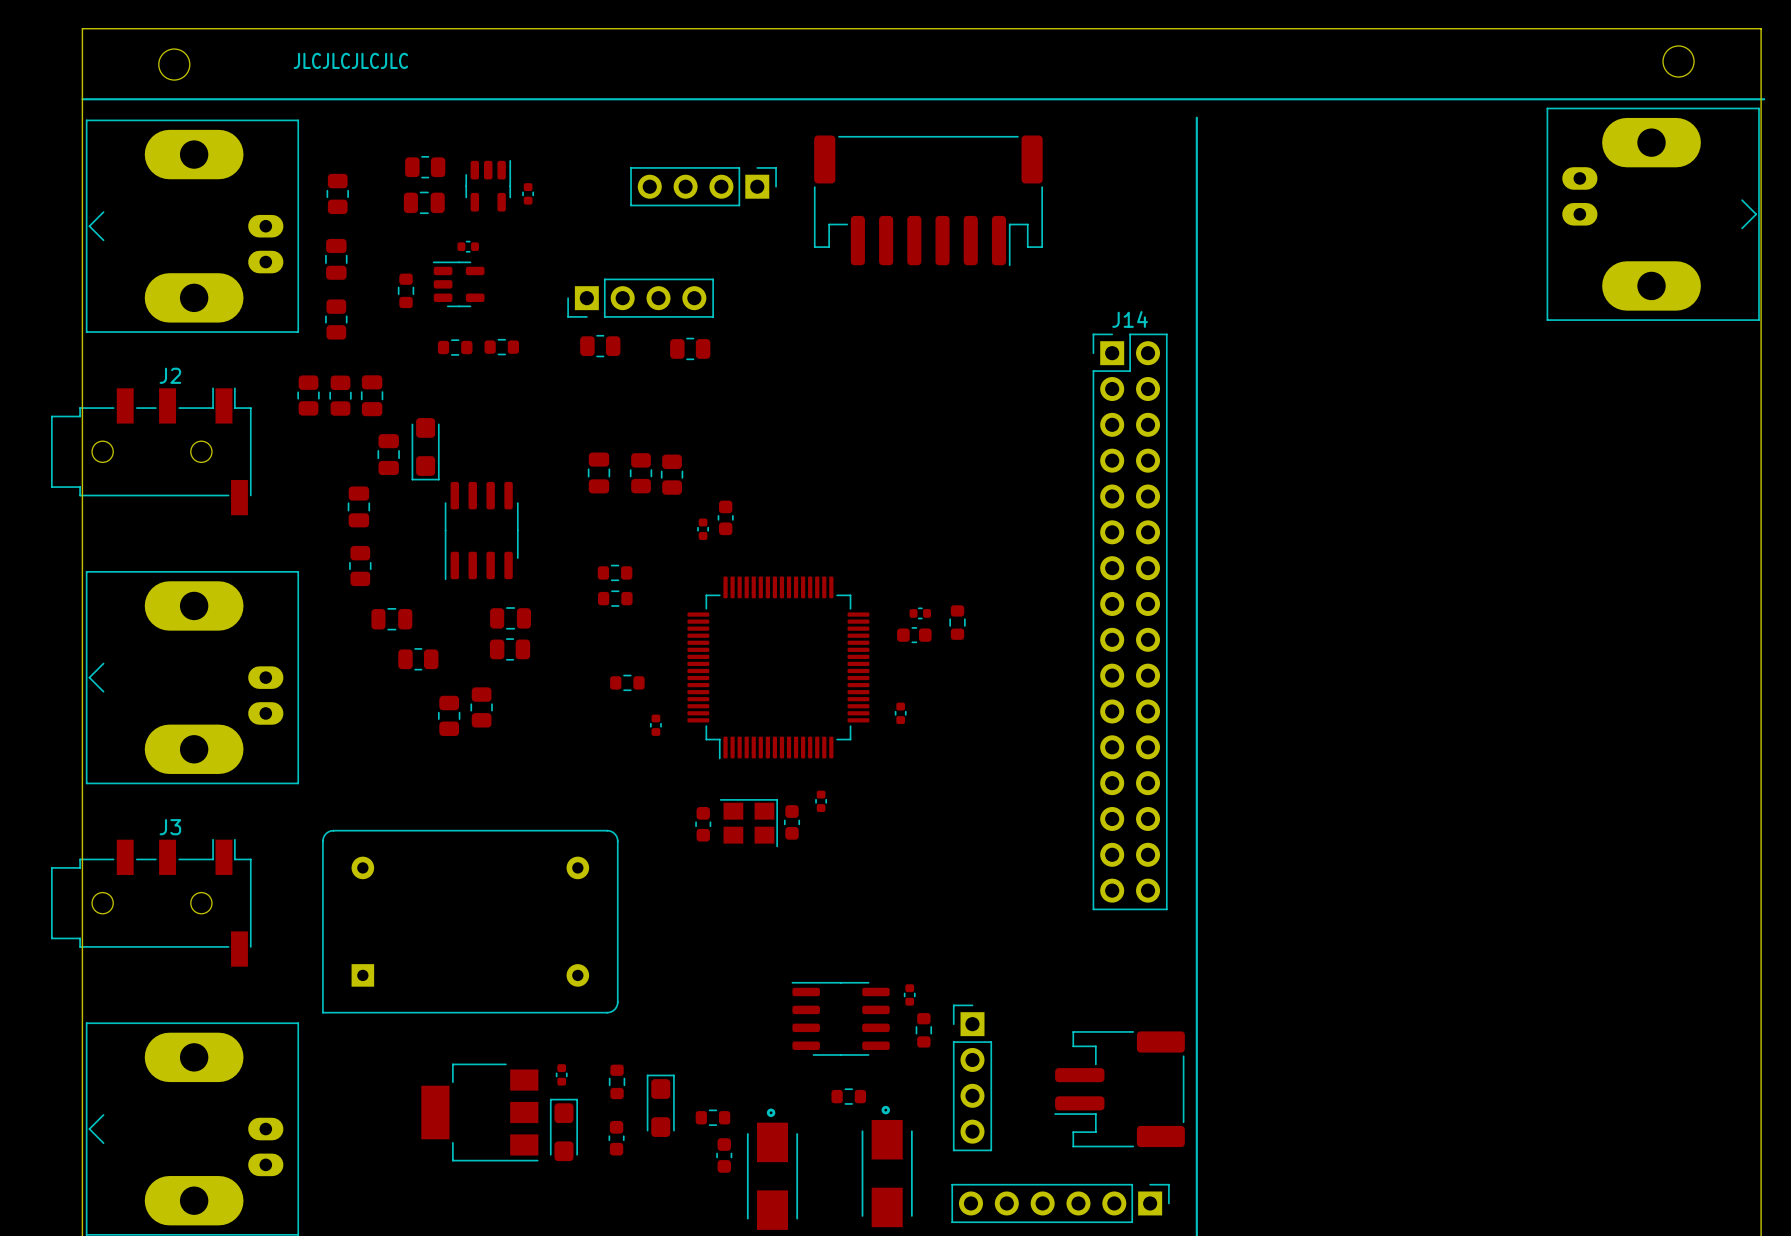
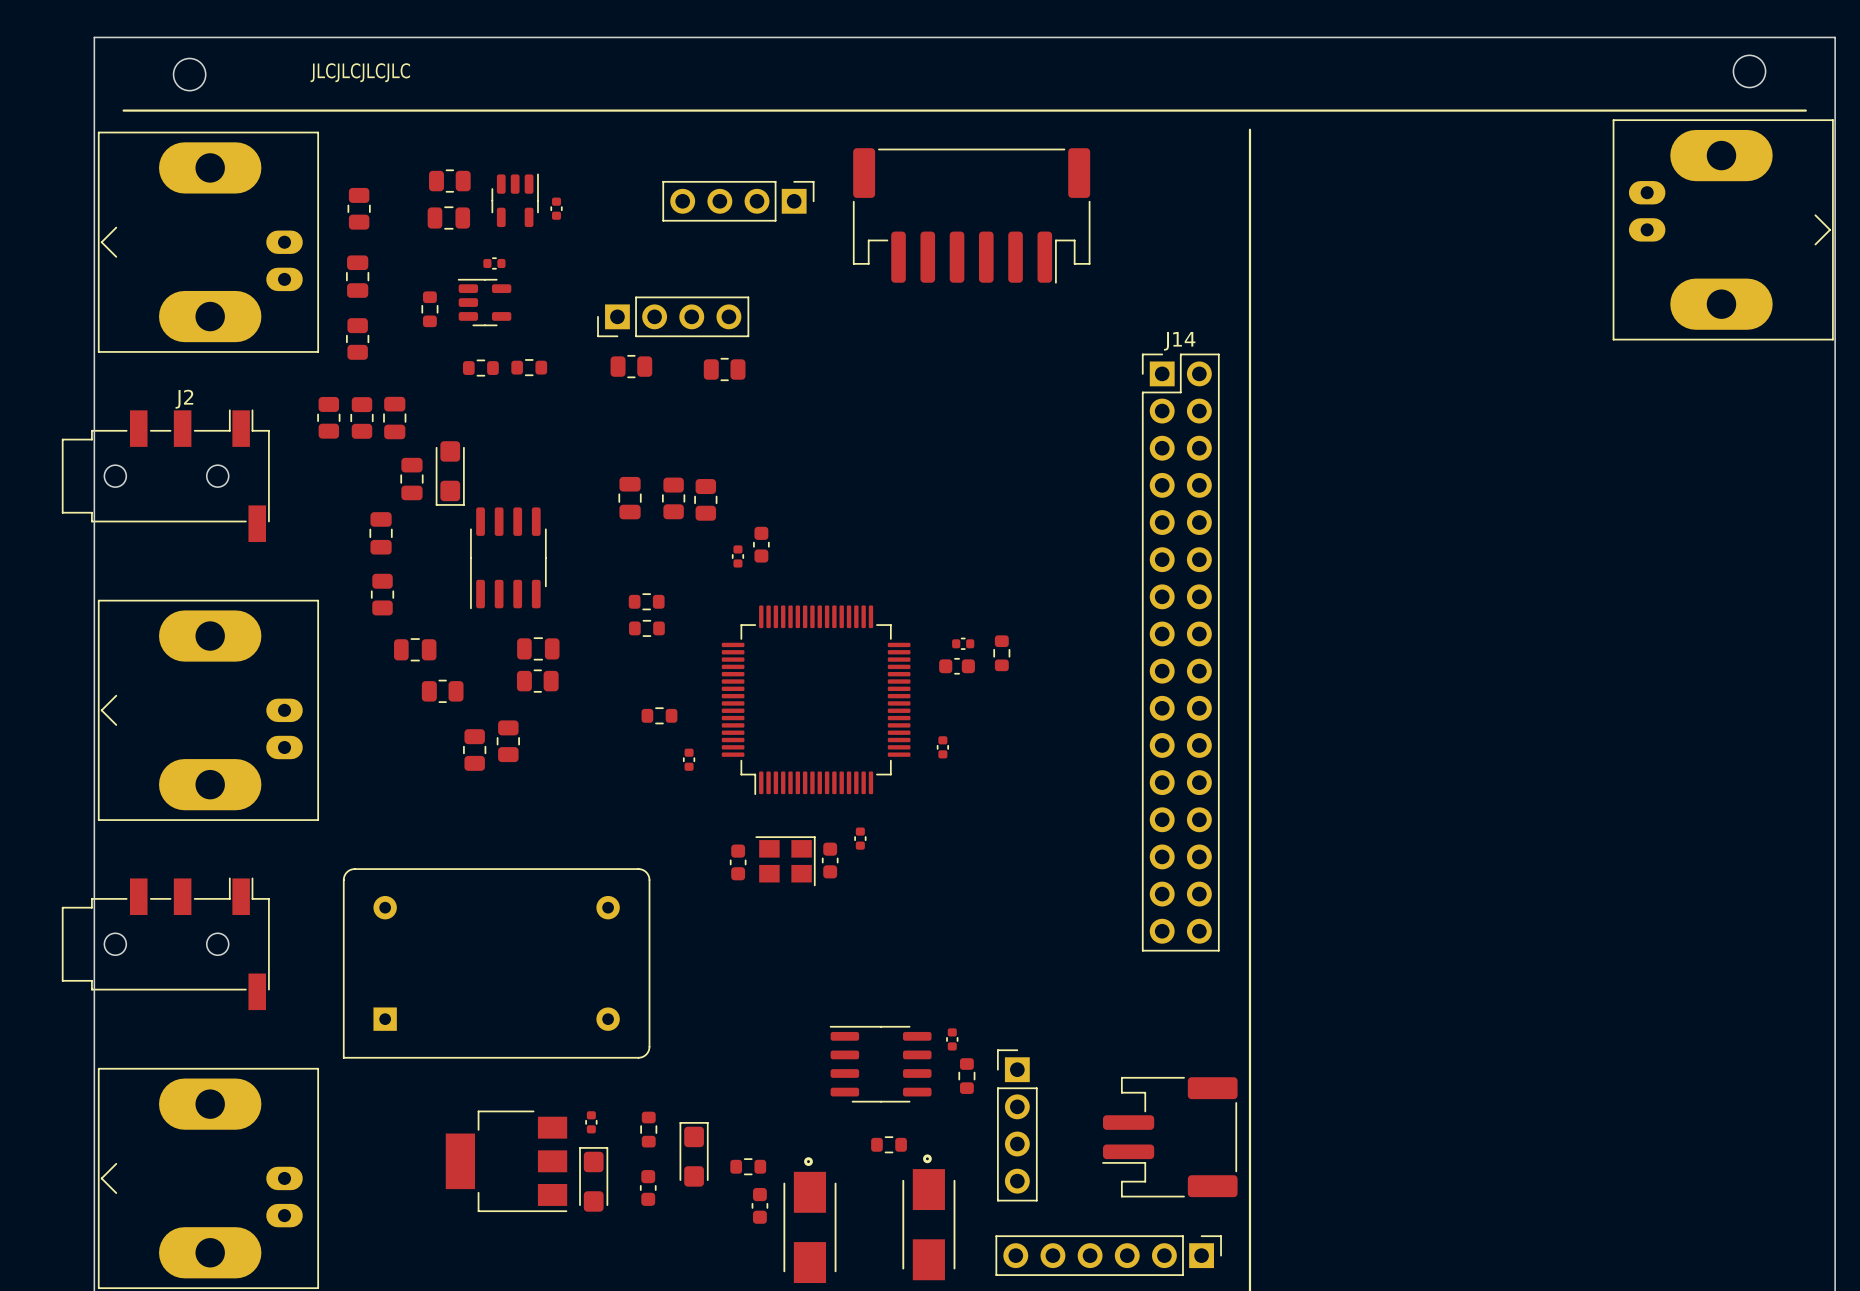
line: (82, 99) (110, 99) -> none
line: (1732, 99) (1764, 99) -> none
J3 name: J3 (170, 827) -> none

